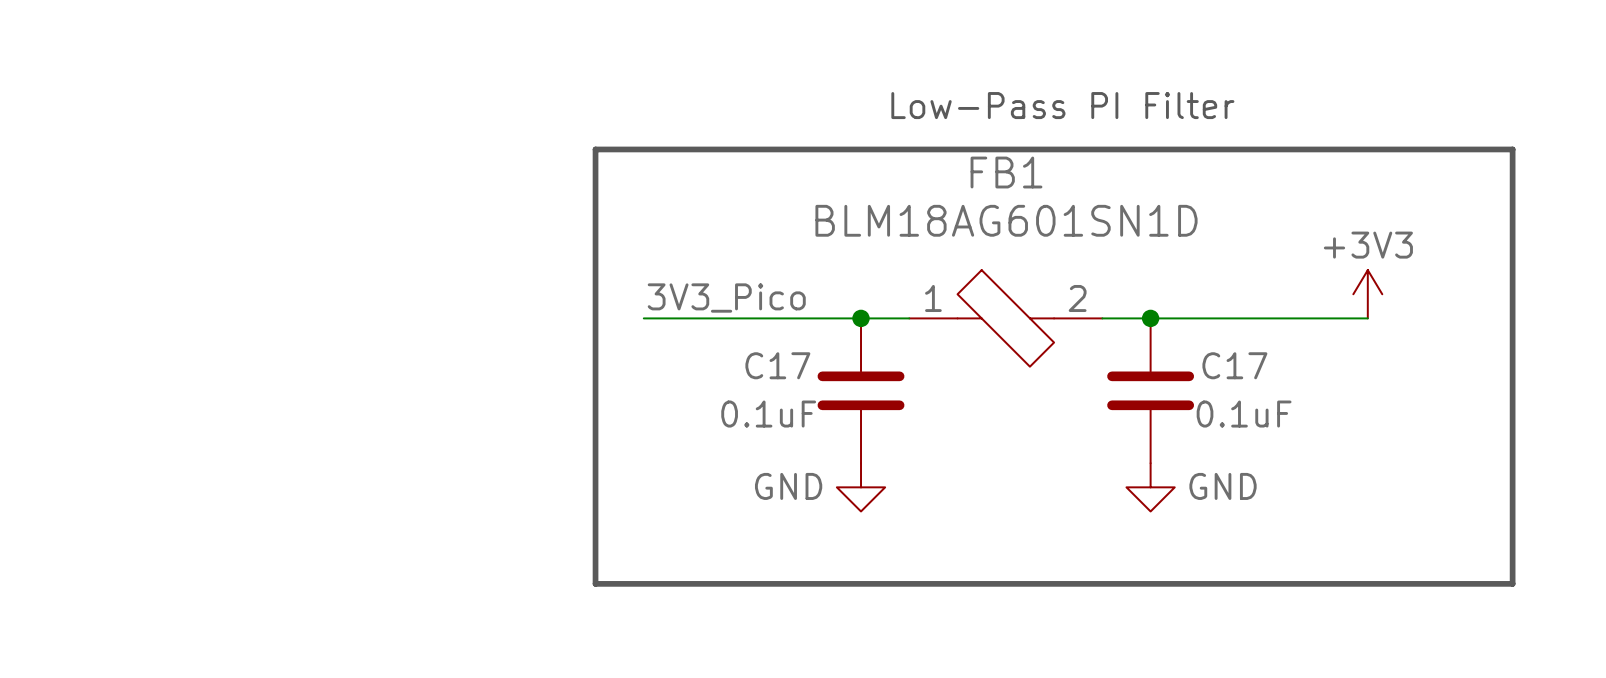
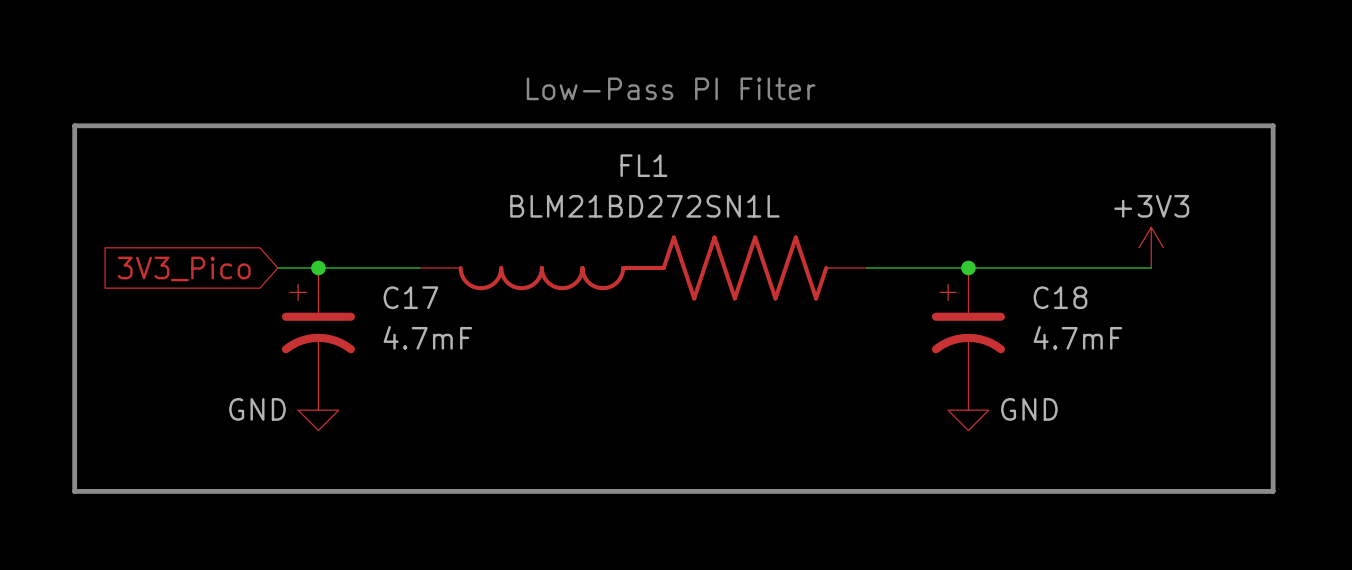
text position: Low-Pass PI Filter (1062, 105) -> Low-Pass PI Filter (671, 88)
line: (595, 149) (595, 583) -> (501, 125) (74, 125) (74, 491) (501, 491)
label: 3V3_Pico (726, 298) -> none
wire: none -> (277, 267) (419, 267)
junction: none -> (318, 267)
wire: (643, 318) (909, 318) -> none
FL1: none -> BLM21BD272SN1L (643, 267)
junction: (861, 318) -> none
FB1: BLM18AG601SN1D (1005, 318) -> none
global label: none -> 3V3_Pico (184, 268)
C17: none -> 4.7mF (318, 328)
C17: 0.1uF (861, 390) -> none
C17: 0.1uF (1150, 390) -> none
C18: none -> 4.7mF (968, 328)
power symbol: none -> GND (318, 410)
power symbol: GND (861, 487) -> none

